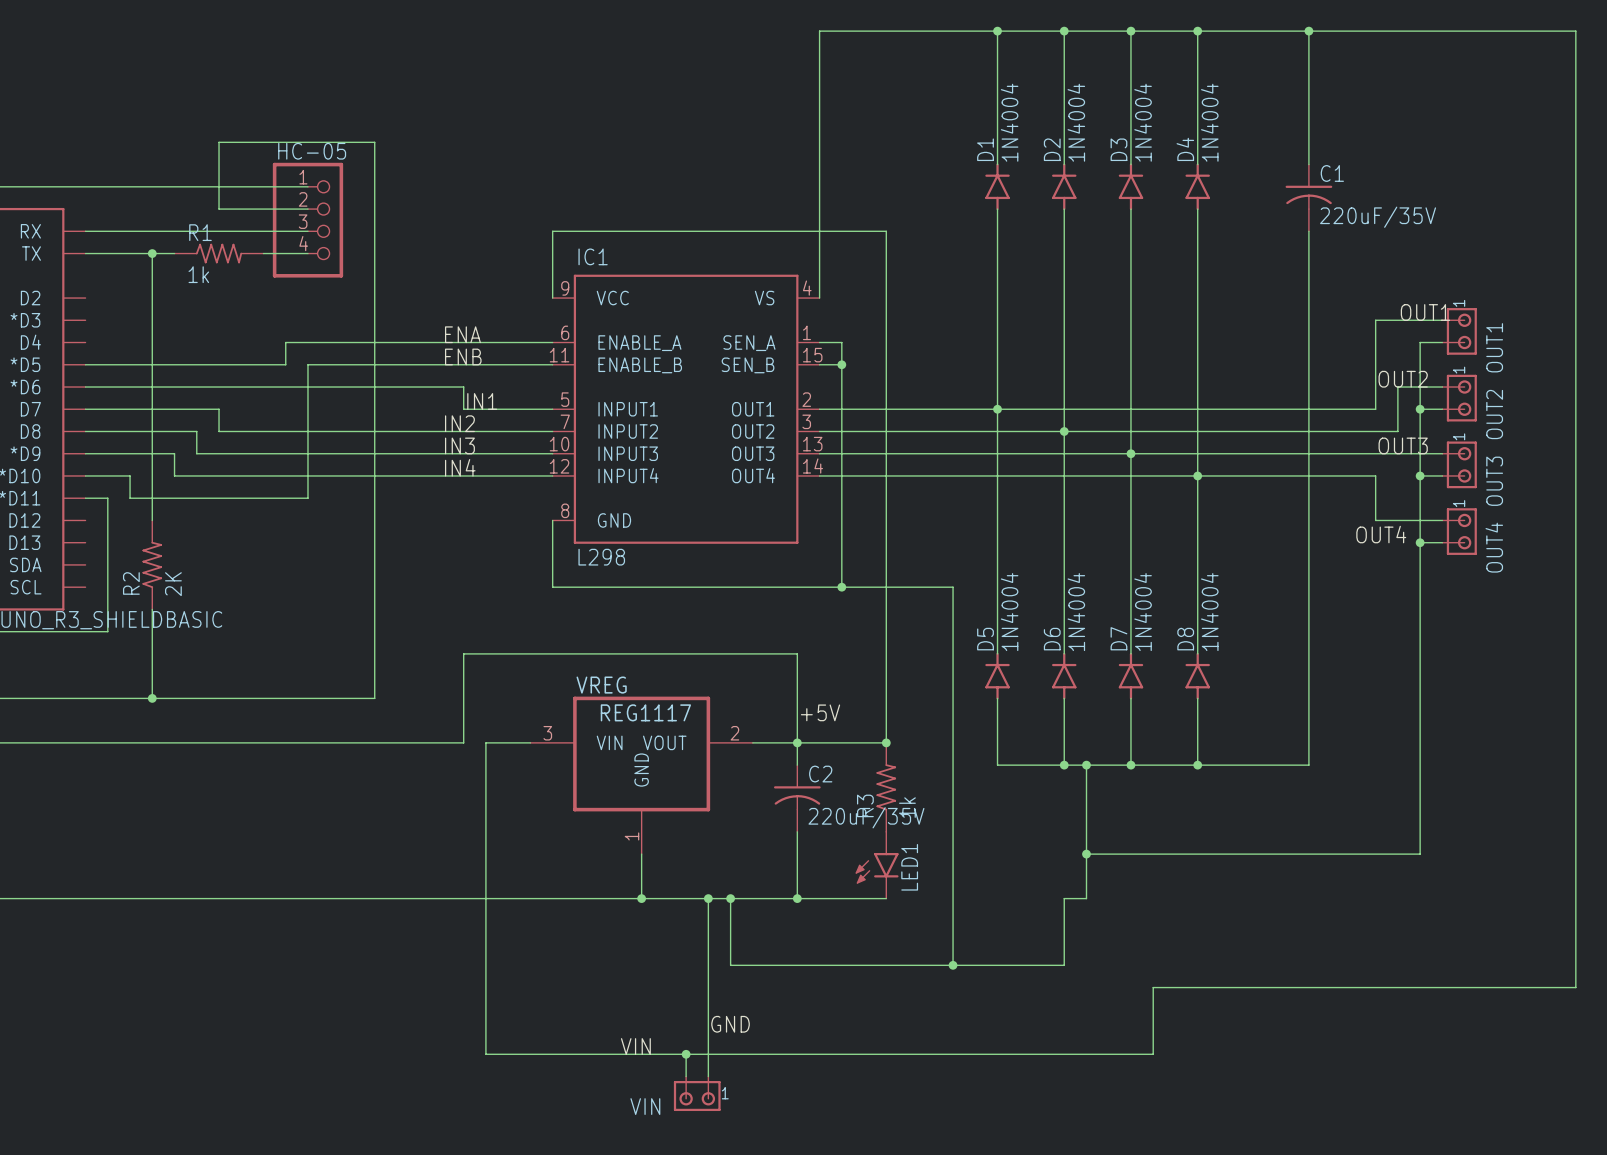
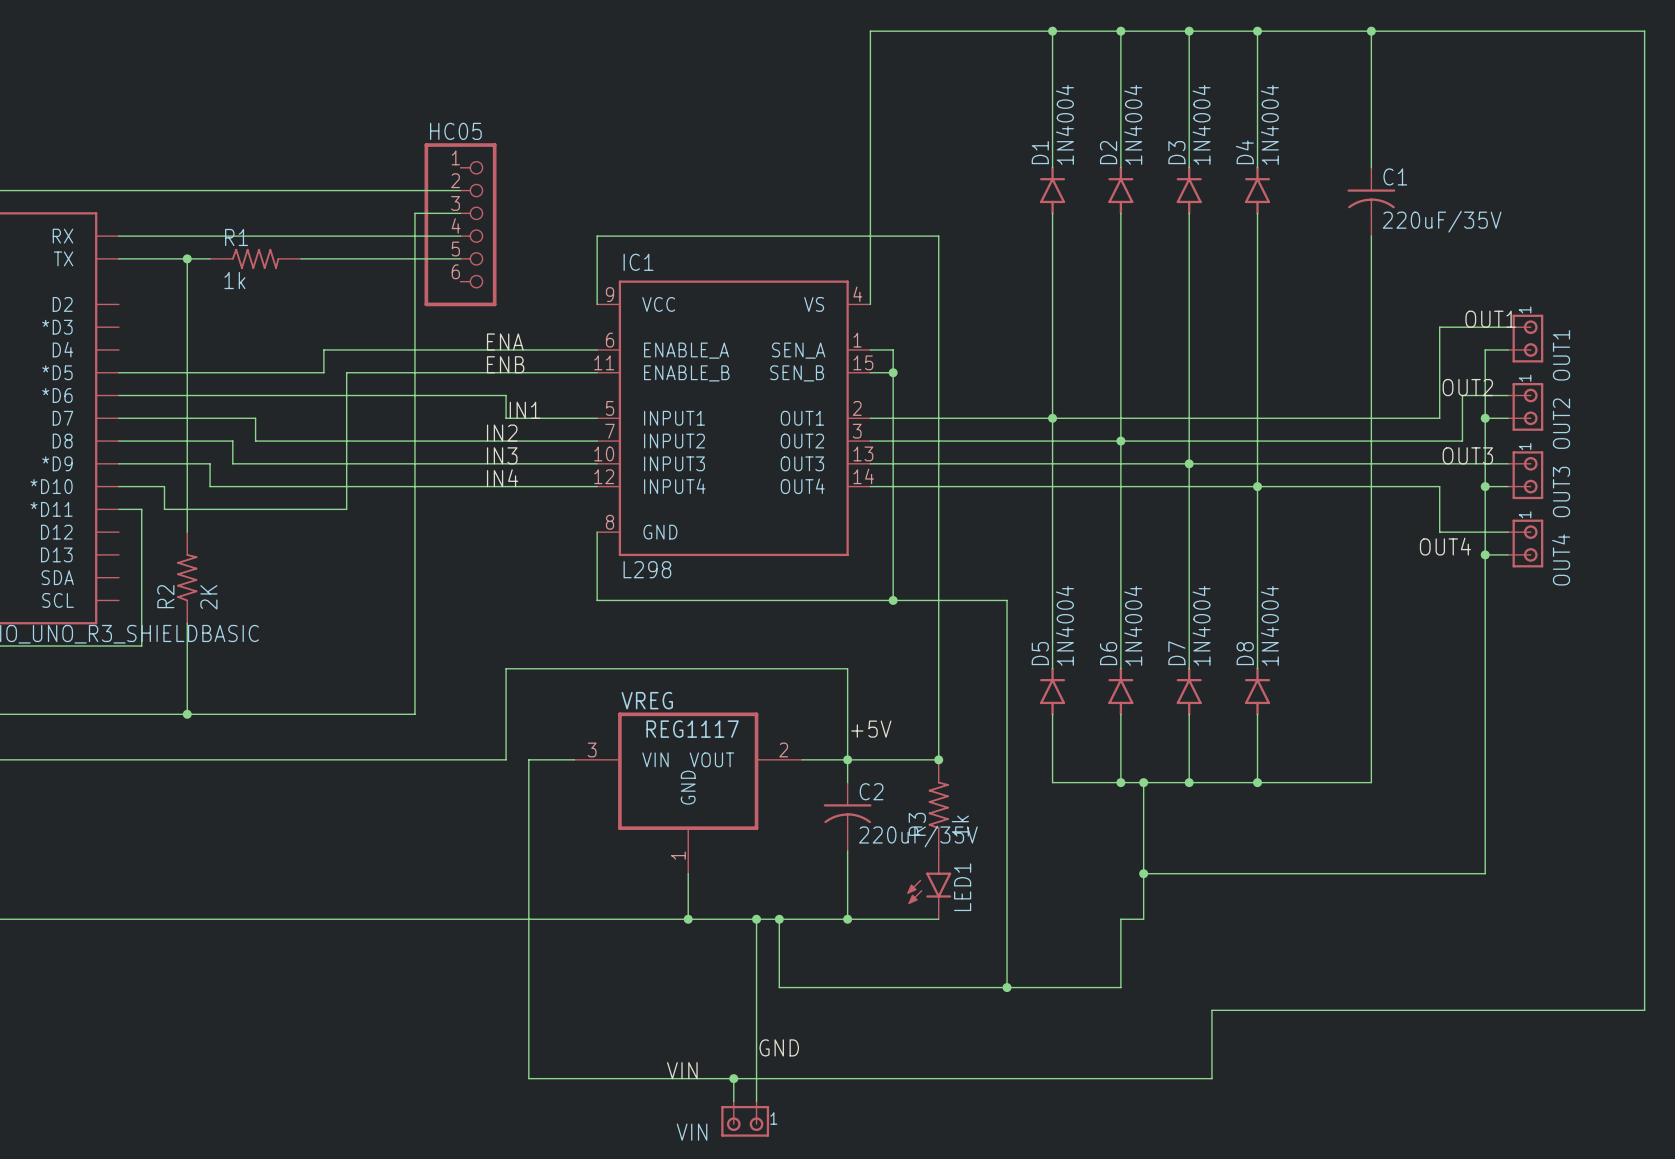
wire: none -> (346, 190) (460, 190)
wire: (307, 209) (219, 209) (219, 142) (374, 142) (374, 209) -> (460, 213) (414, 213)
HC-05: (307, 220) -> none
HC05: none -> (460, 224)
wire: none -> (346, 236) (460, 236)
wire: none -> (346, 258) (460, 258)

